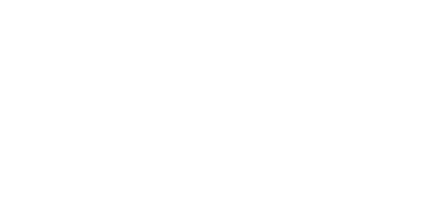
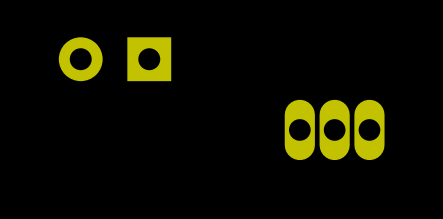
part: none -> (115, 59)
part: none -> (334, 129)

